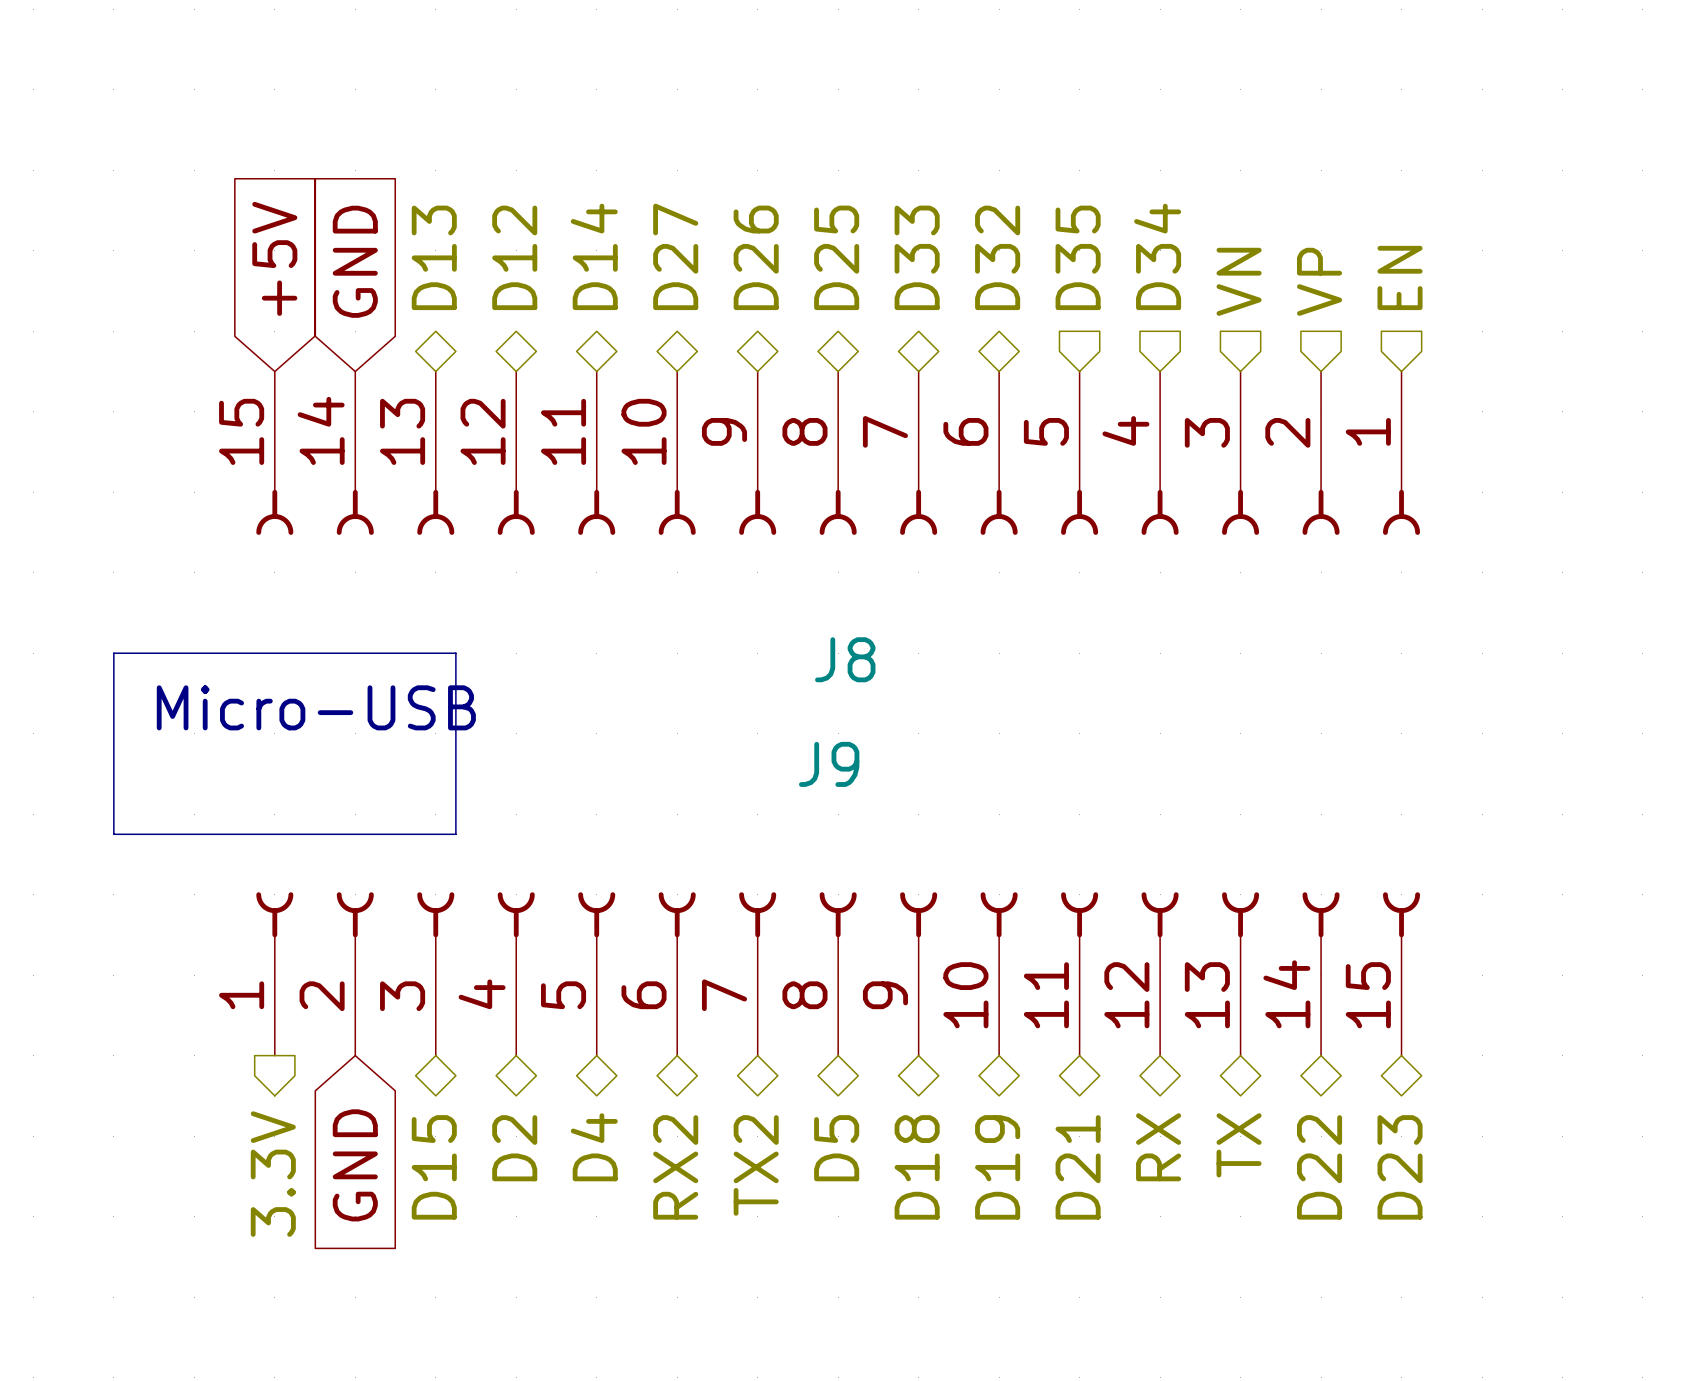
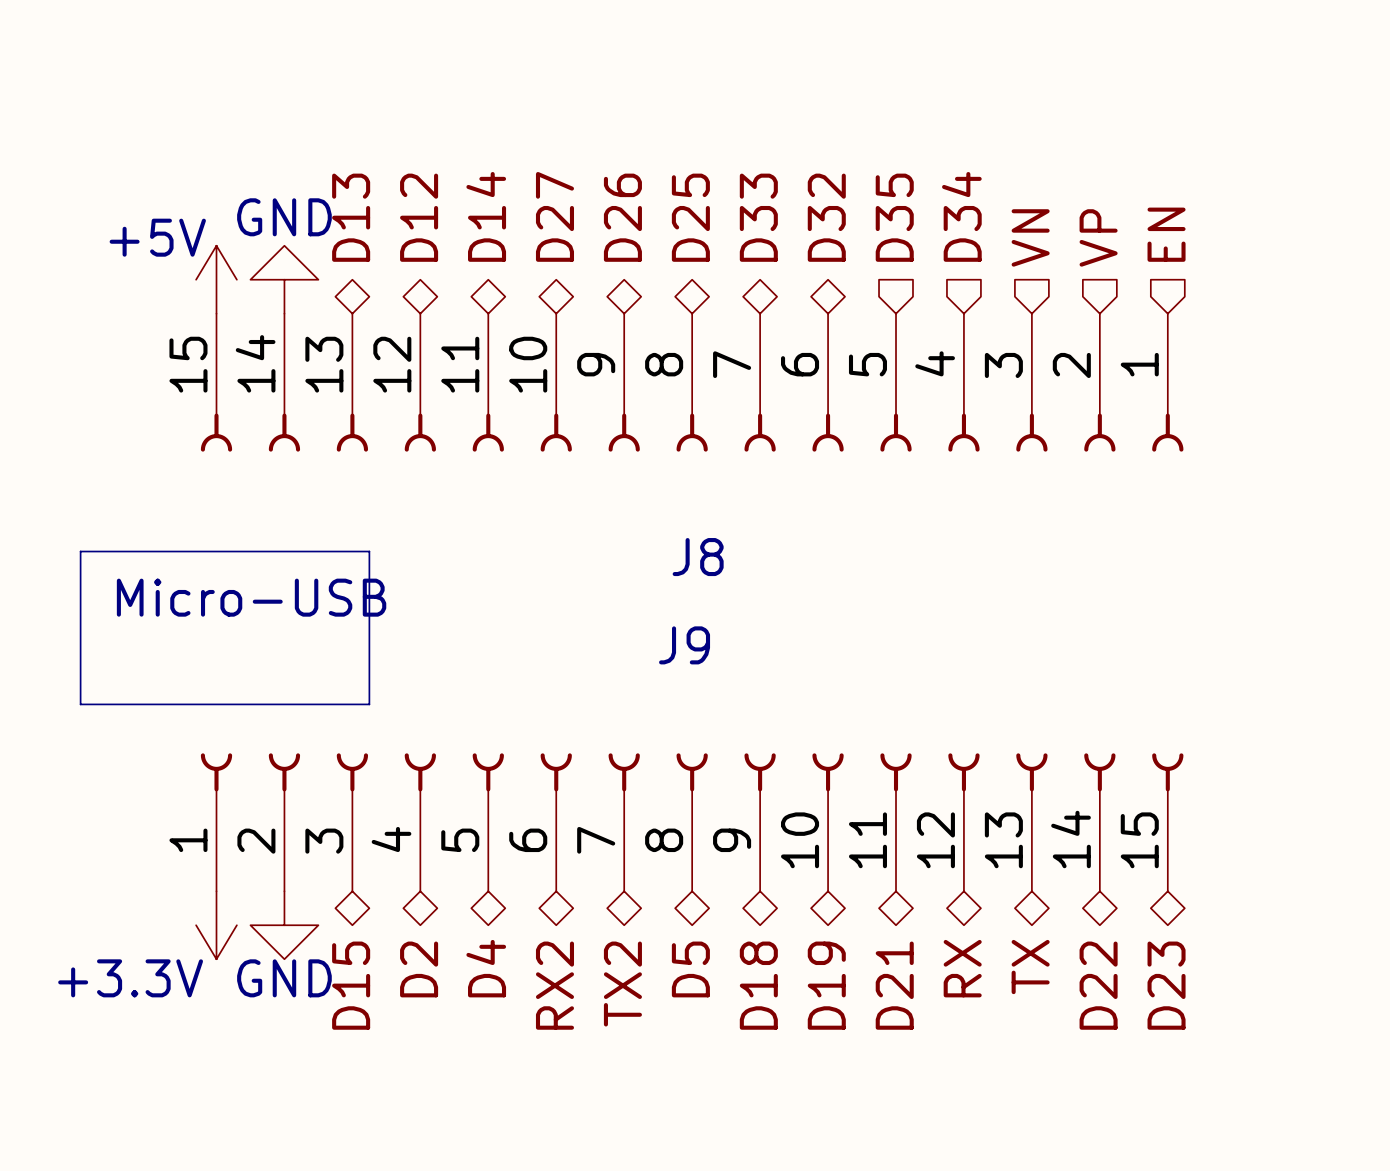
global label: +5V (274, 258) -> none
global label: GND (355, 261) -> none
power symbol: none -> +5V (216, 279)
power symbol: none -> GND (284, 279)
power symbol: none -> +3.3V (216, 925)
power symbol: none -> GND (284, 925)
global label: GND (355, 1165) -> none
hierarchical label: 3.3V (273, 1174) -> none

